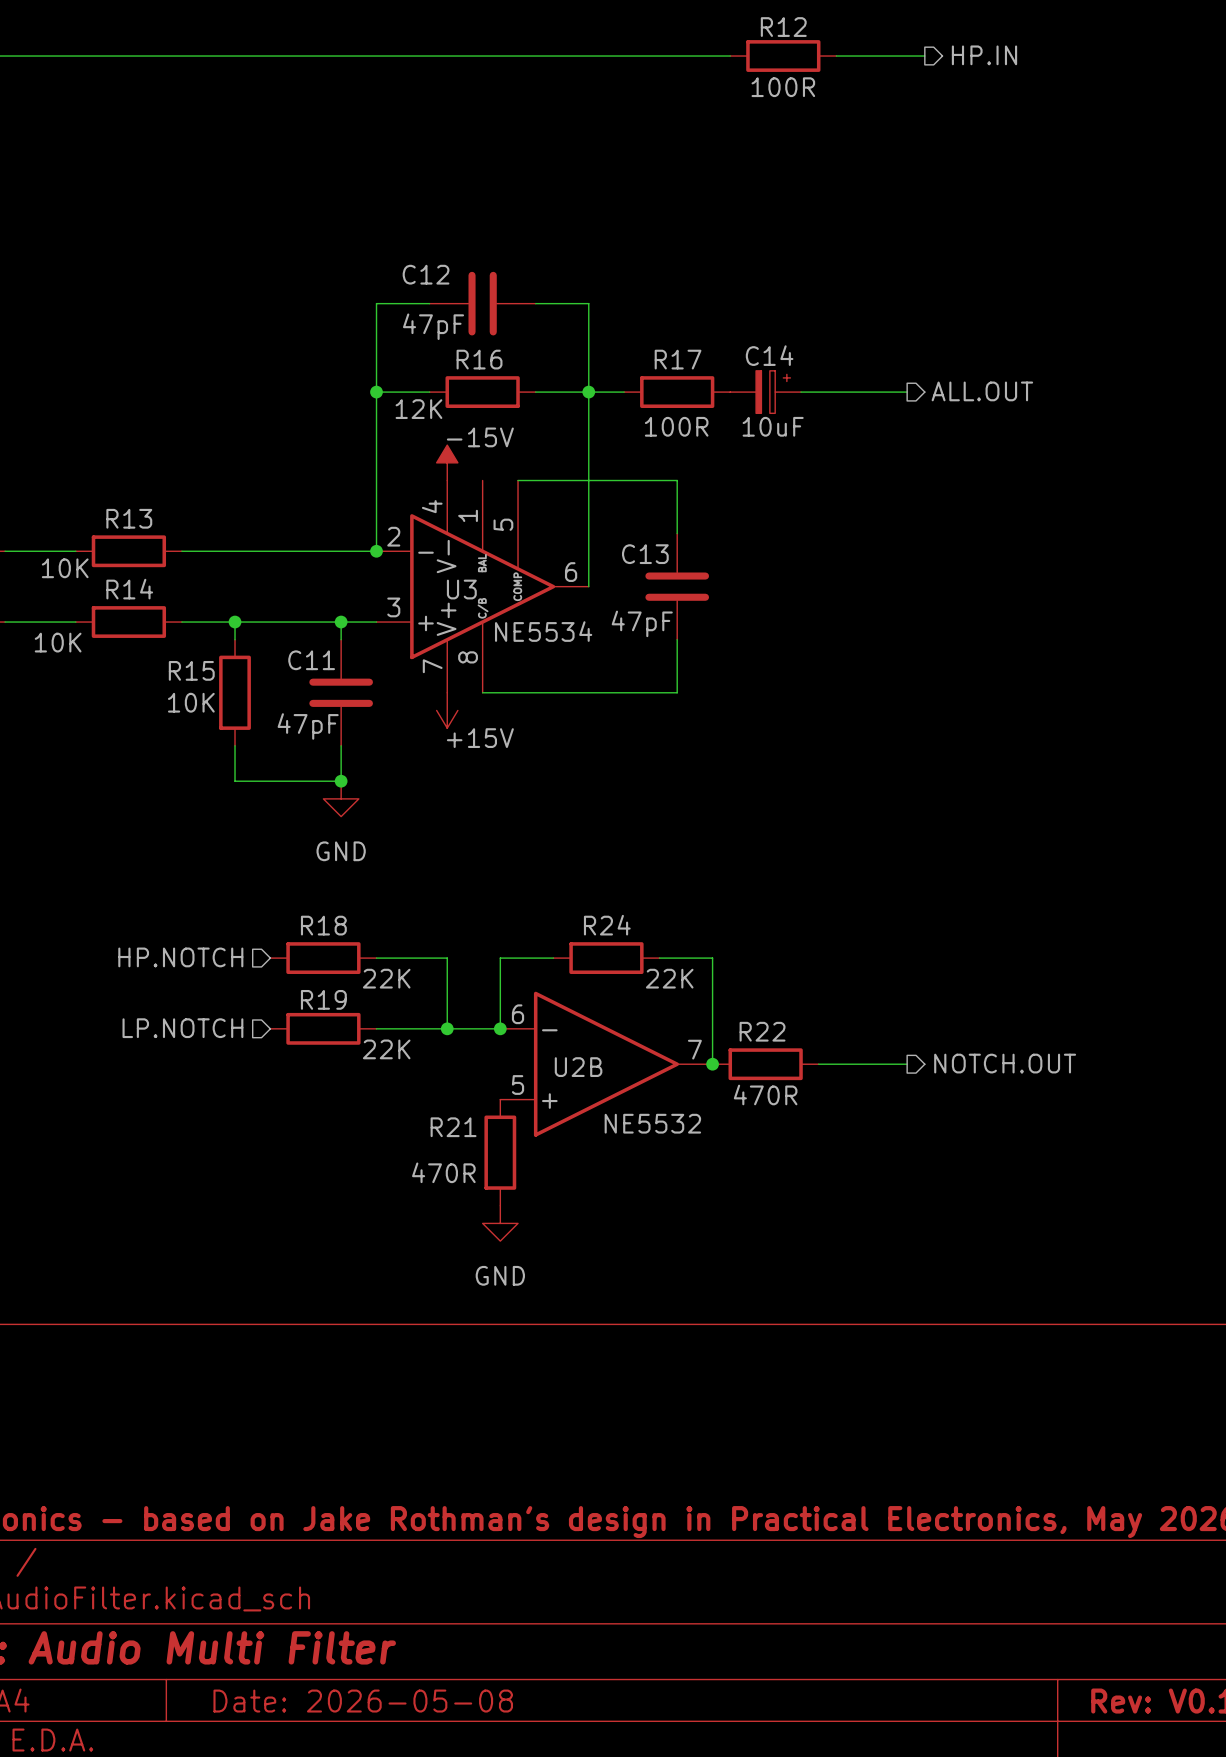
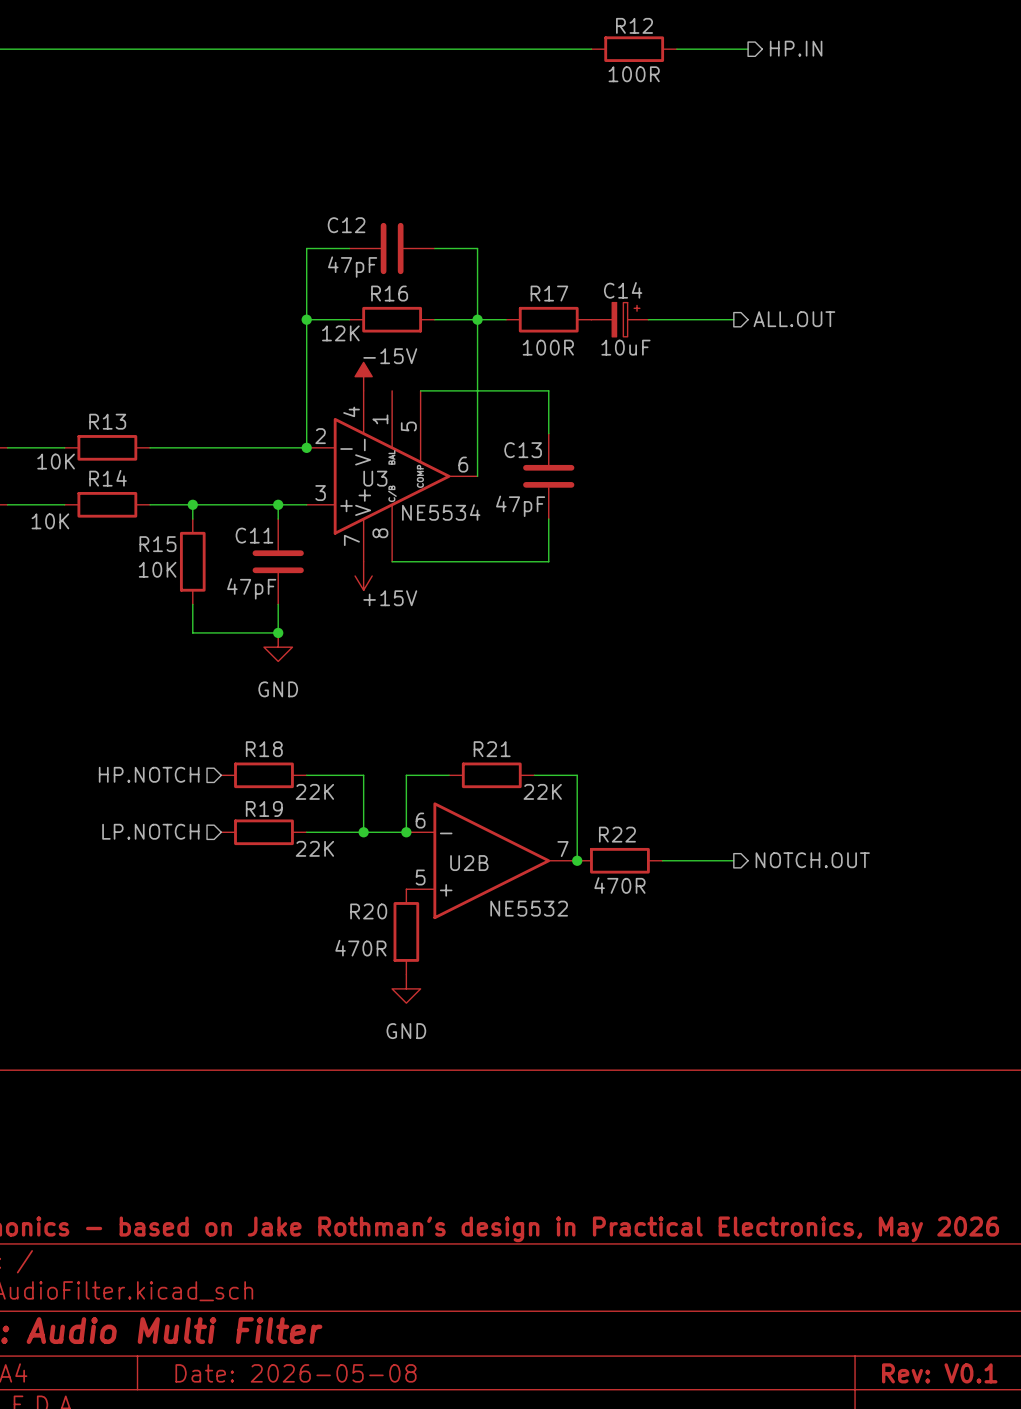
R24 name: R24 (607, 925) -> R21 (492, 749)
R21 name: R21 (453, 1127) -> R20 (368, 911)

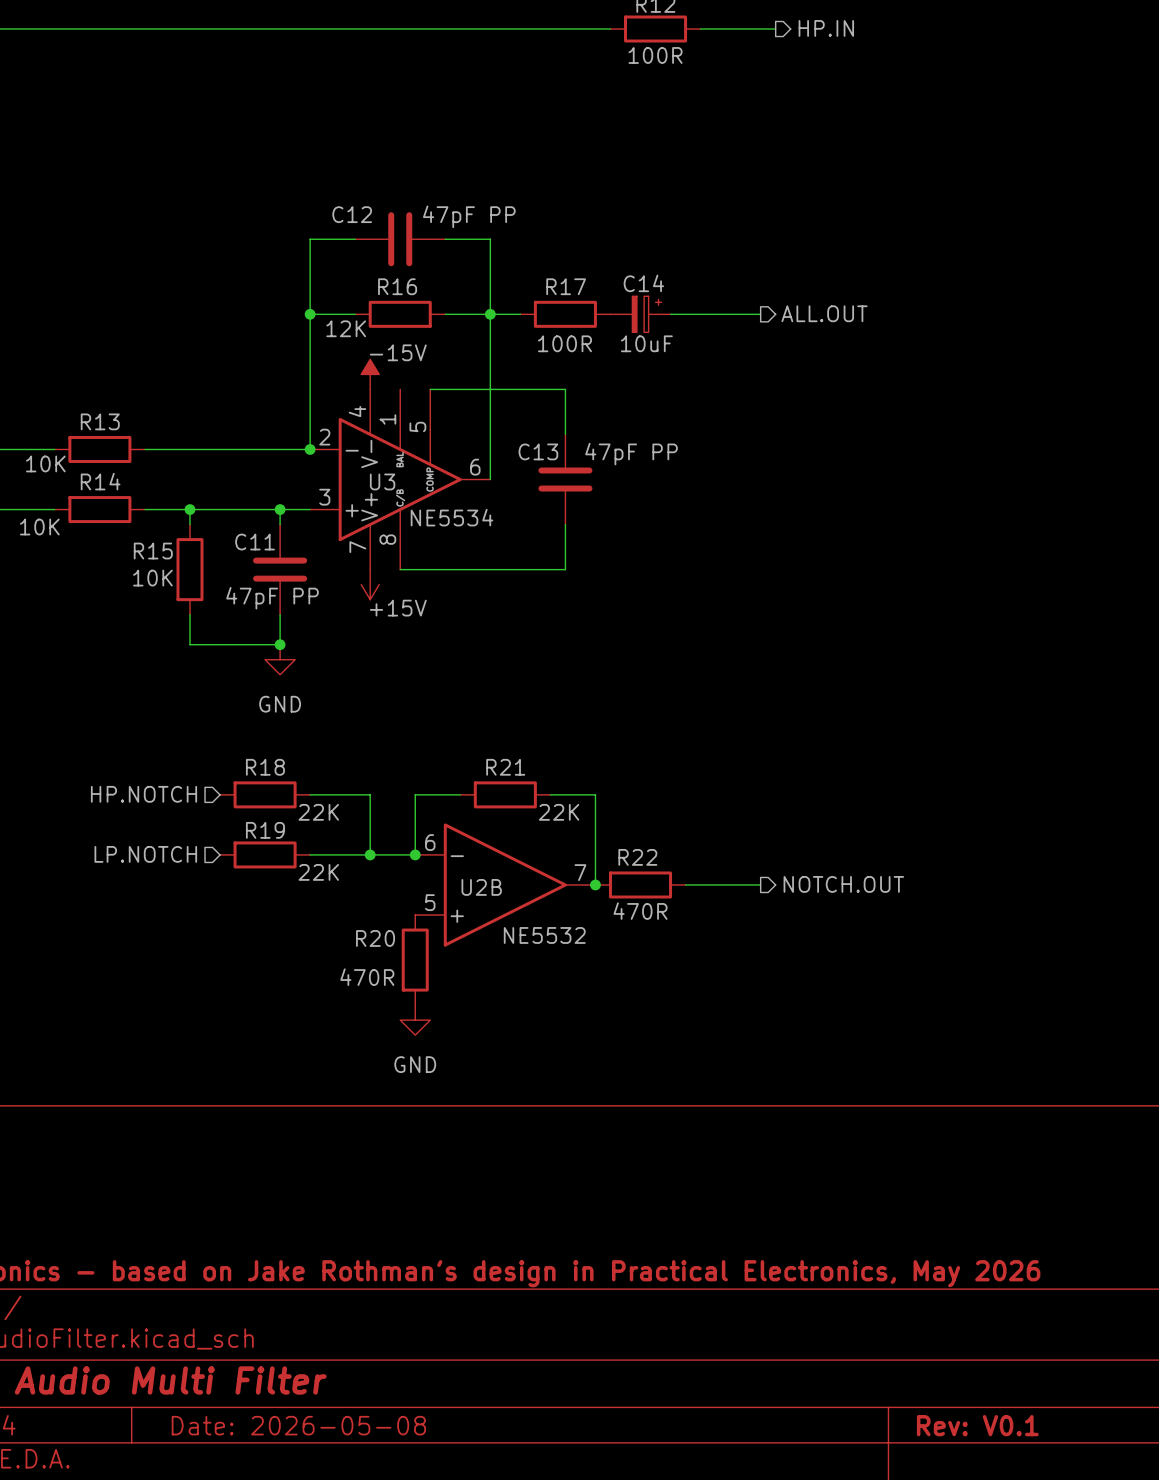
C12 value: 47pF (352, 267) -> 47pF PP (469, 216)
C13 value: 47pF (520, 506) -> 47pF PP (631, 454)
C11 value: 47pF (251, 588) -> 47pF PP (272, 598)

